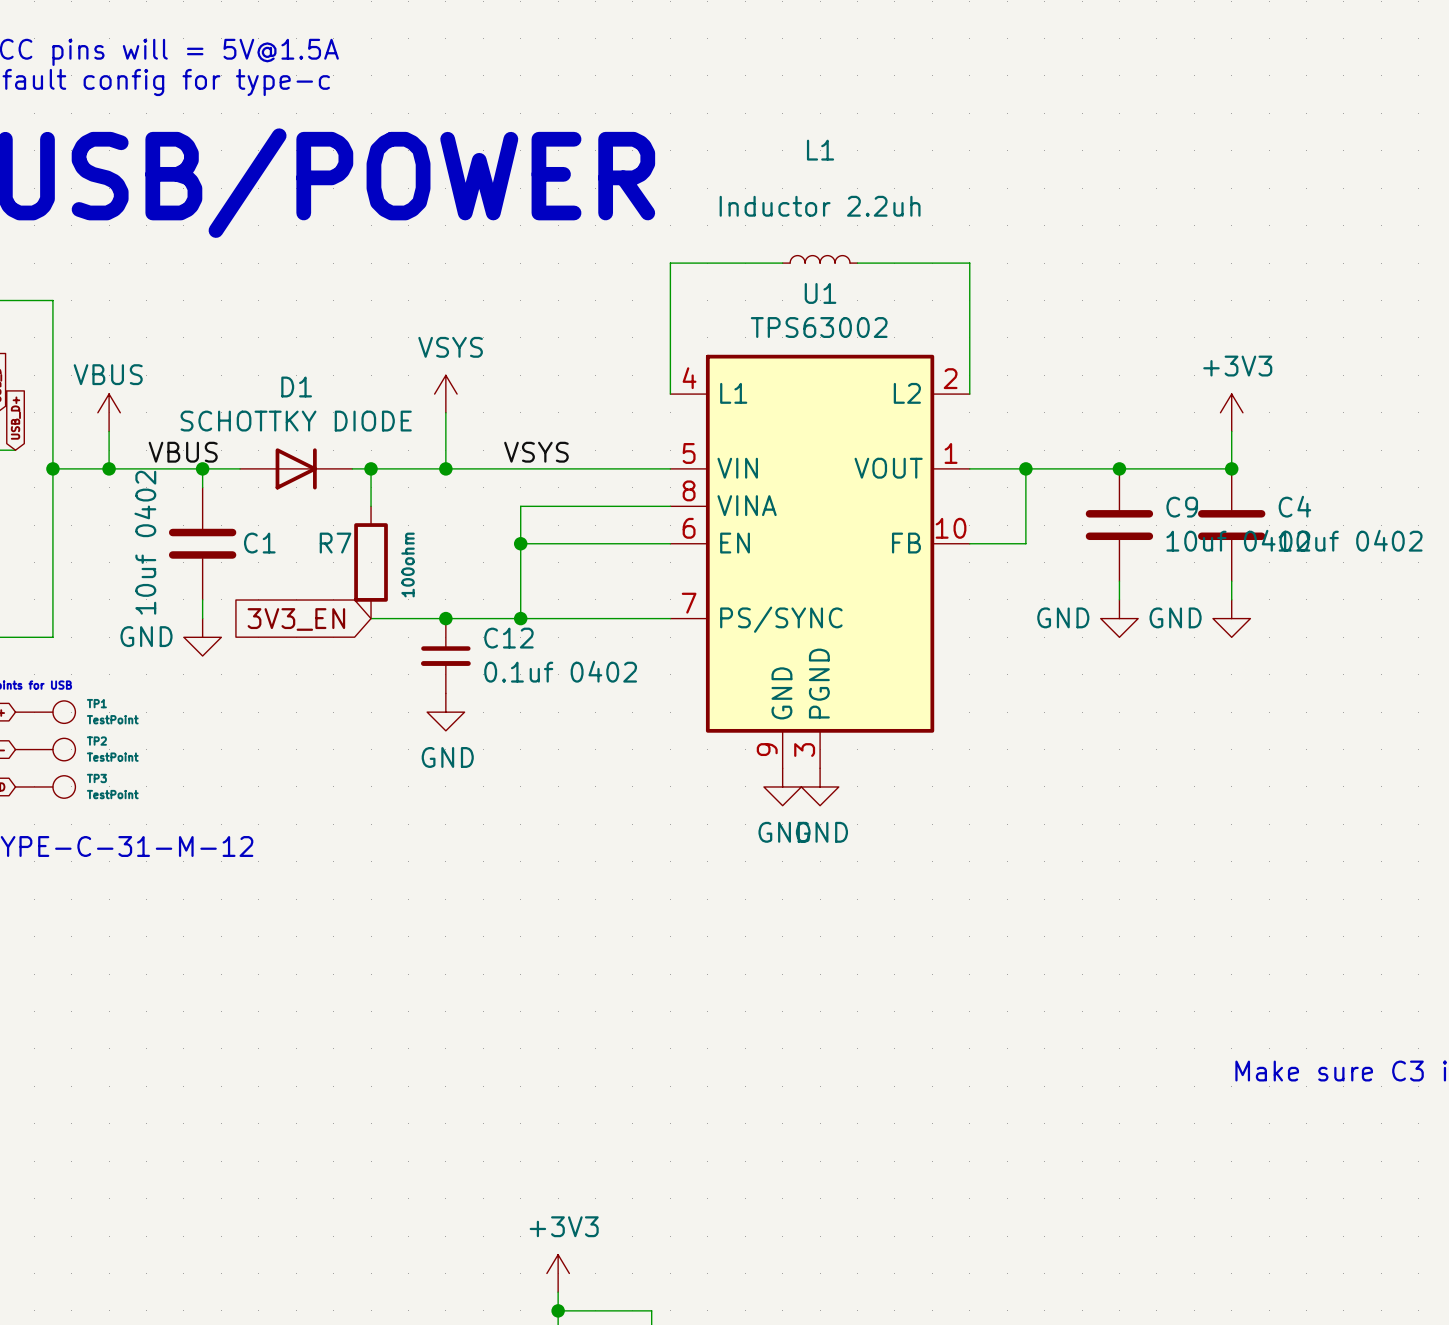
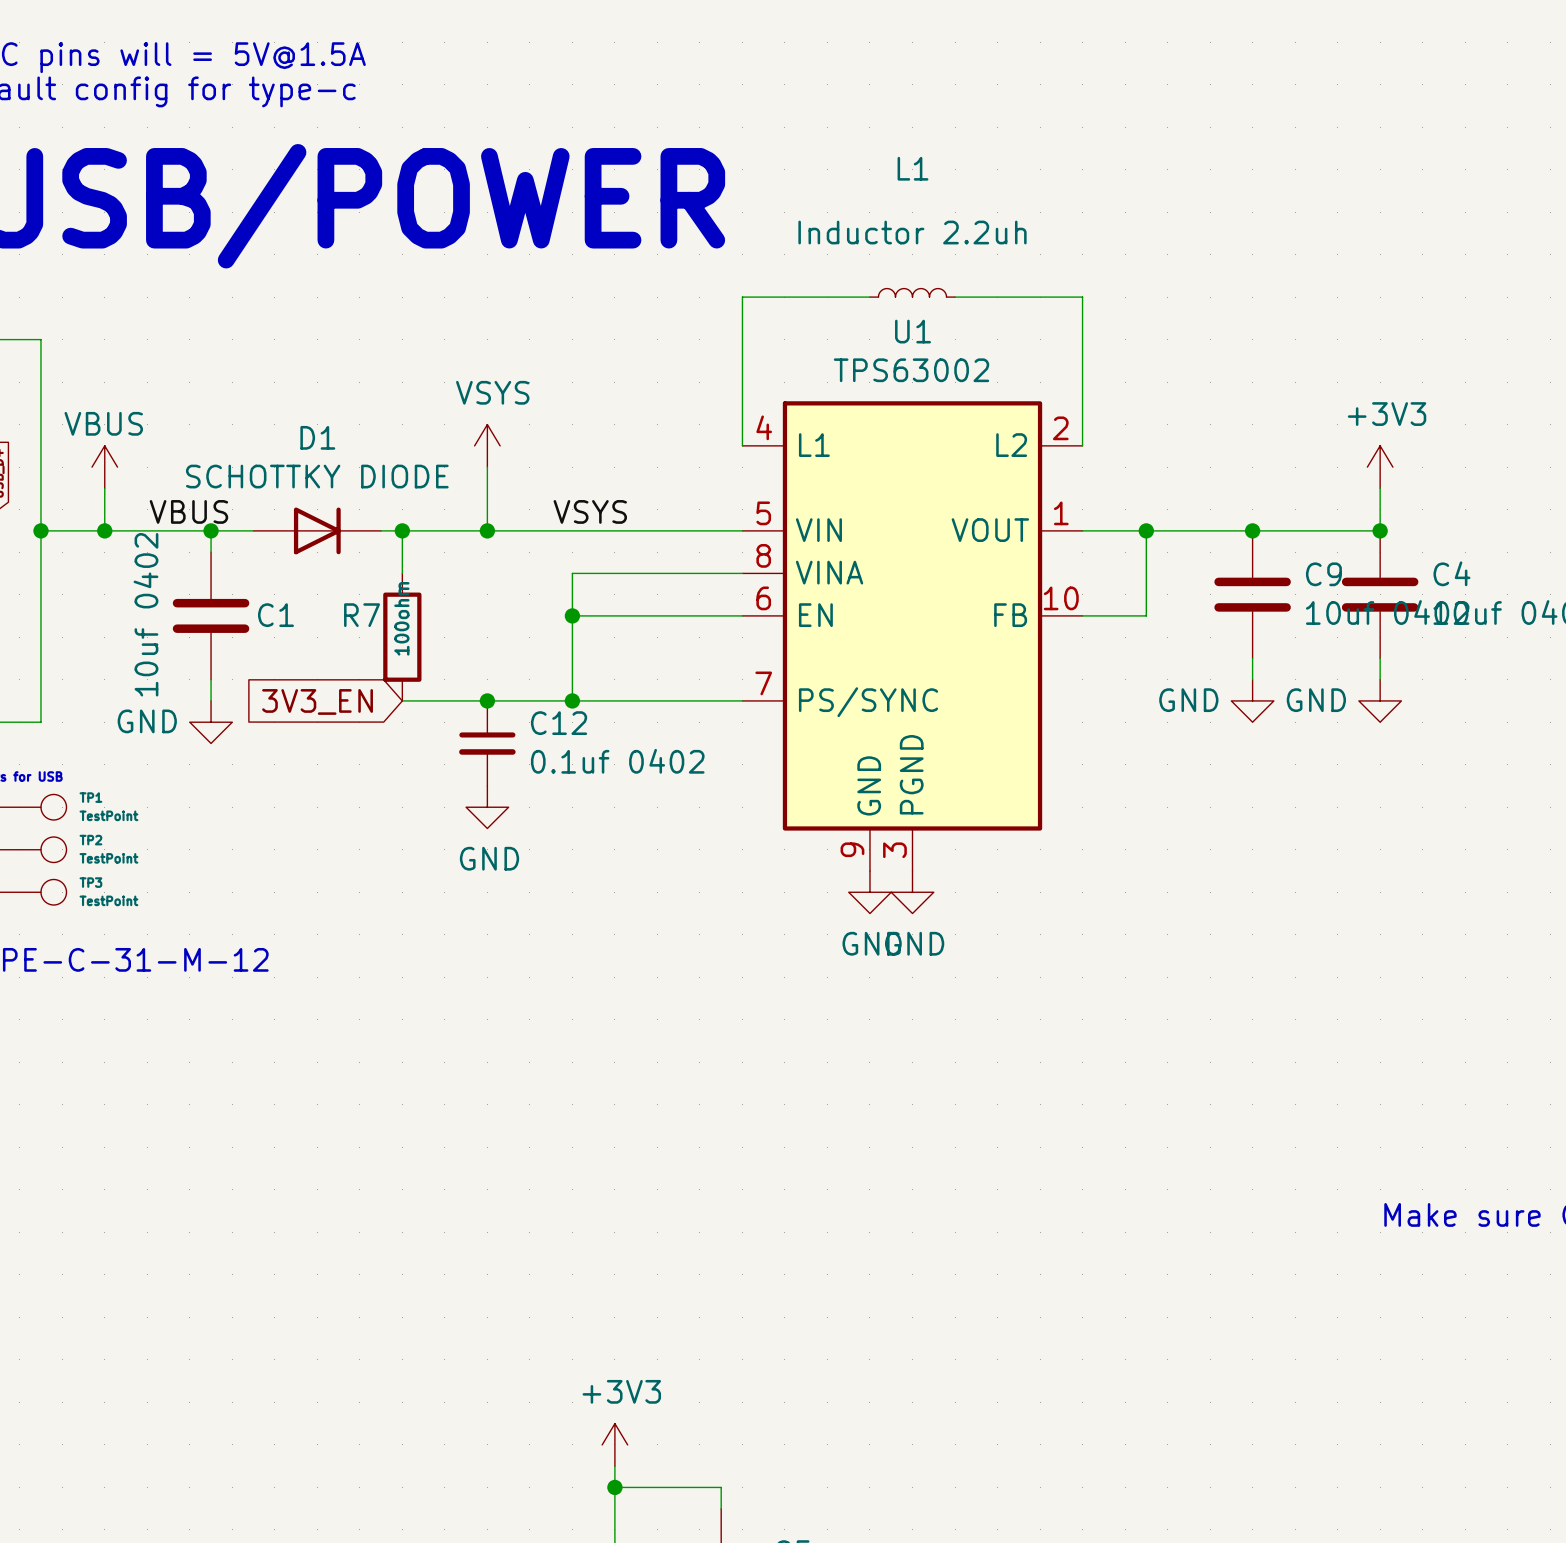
R7 value position: 100ohm (408, 564) -> 100ohm (401, 618)

